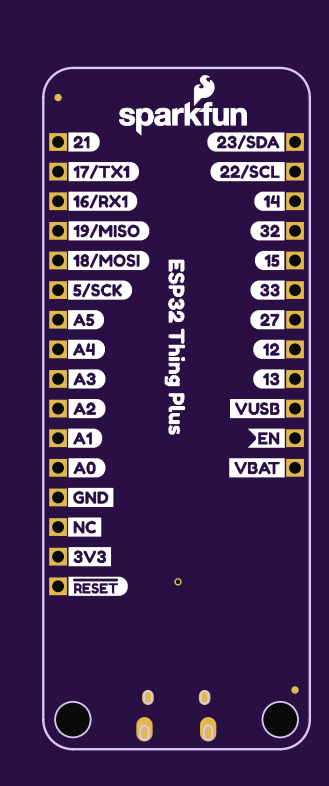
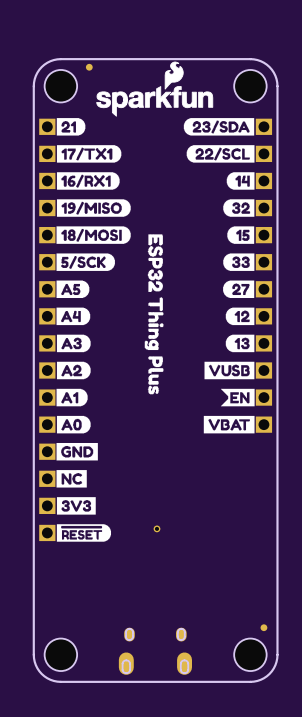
drawing shape: [119, 75, 247, 136] -> [96, 61, 214, 117]
part position: (58, 97) -> (89, 67)
part: none -> (60, 86)
part: none -> (250, 86)

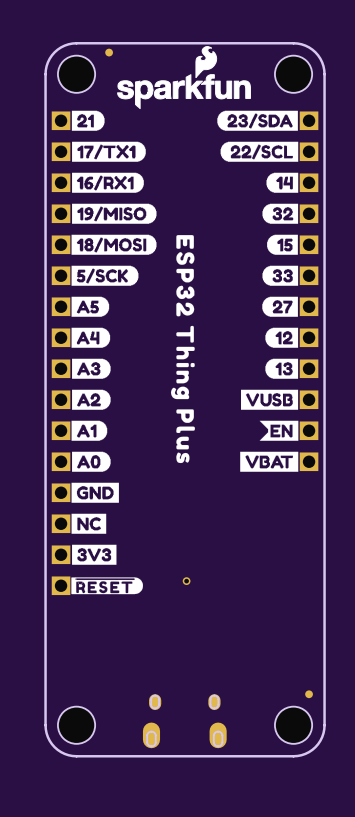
drawing: none -> [170, 235, 195, 464]
drawing: [144, 234, 164, 395] -> none
drawing shape: [56, 524, 112, 542] -> [71, 577, 143, 595]

